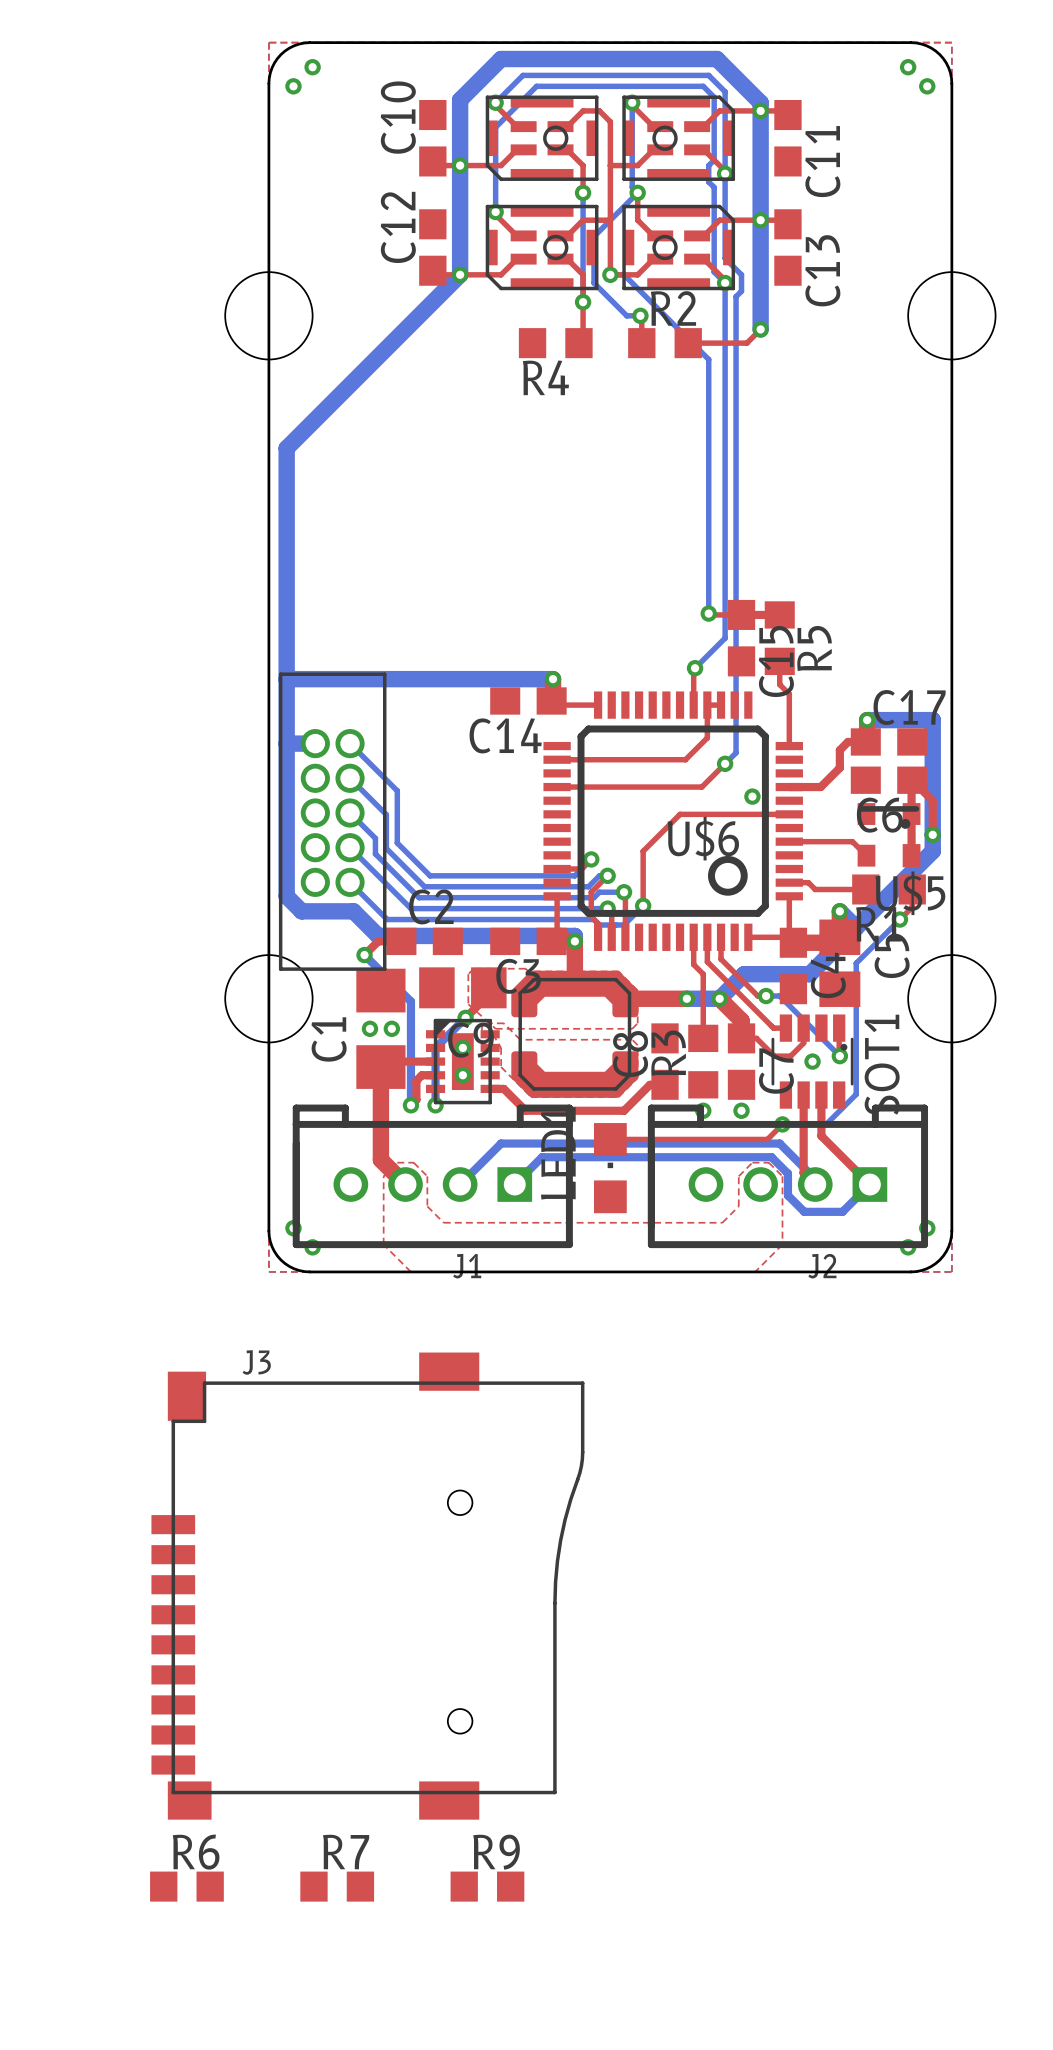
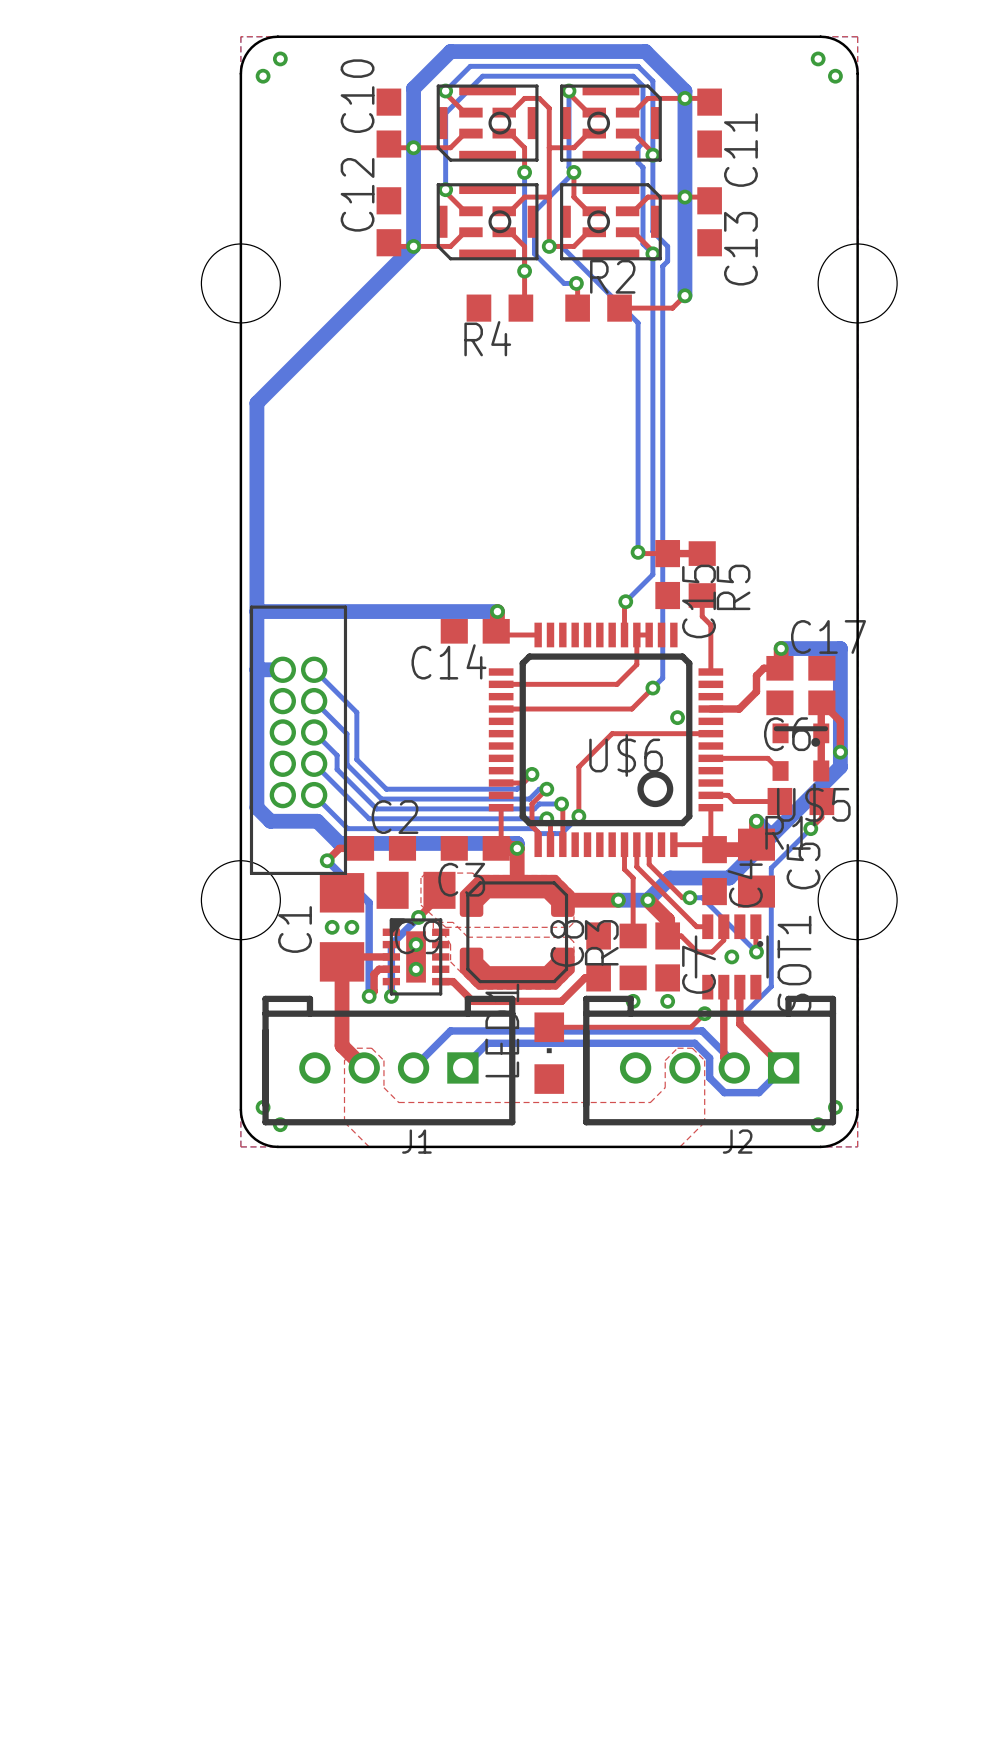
J3: (367, 1586) -> none
R6: (186, 1886) -> none
R7: (337, 1886) -> none
R9: (487, 1886) -> none

